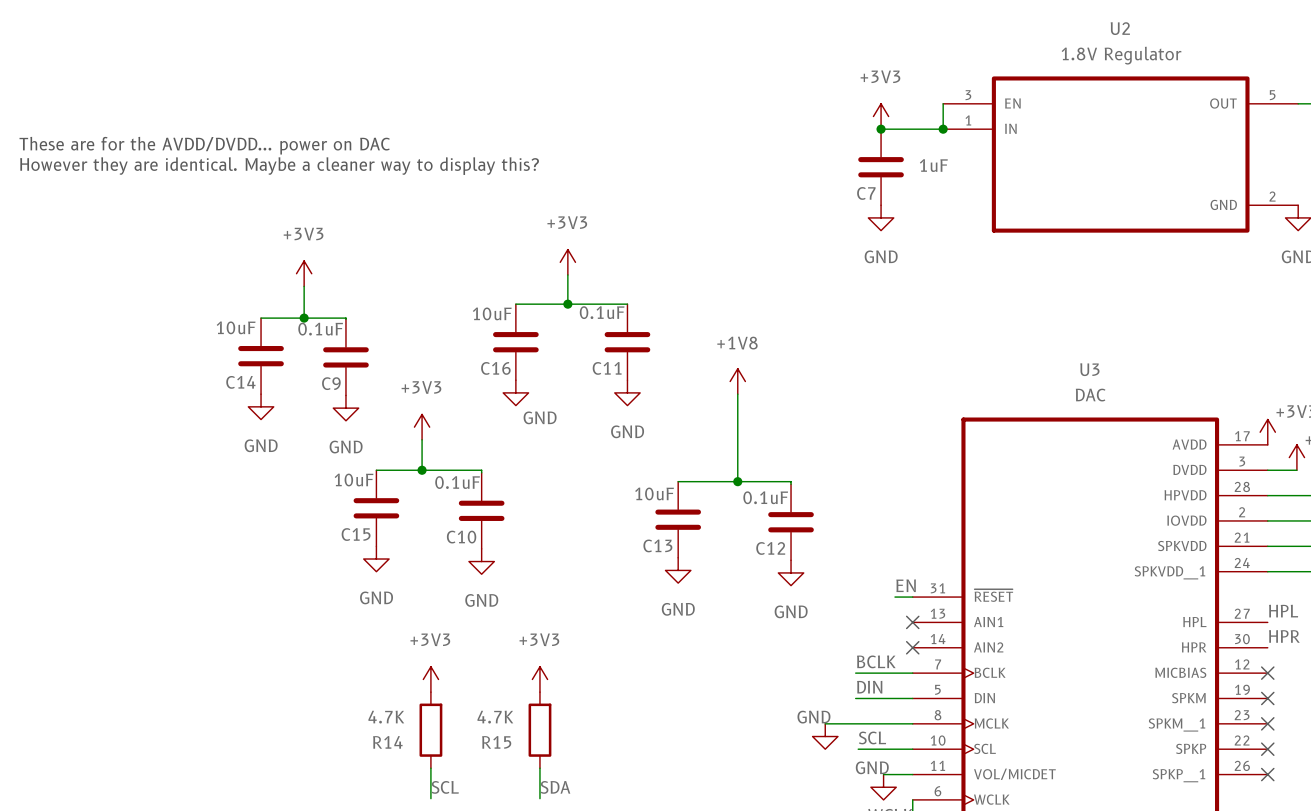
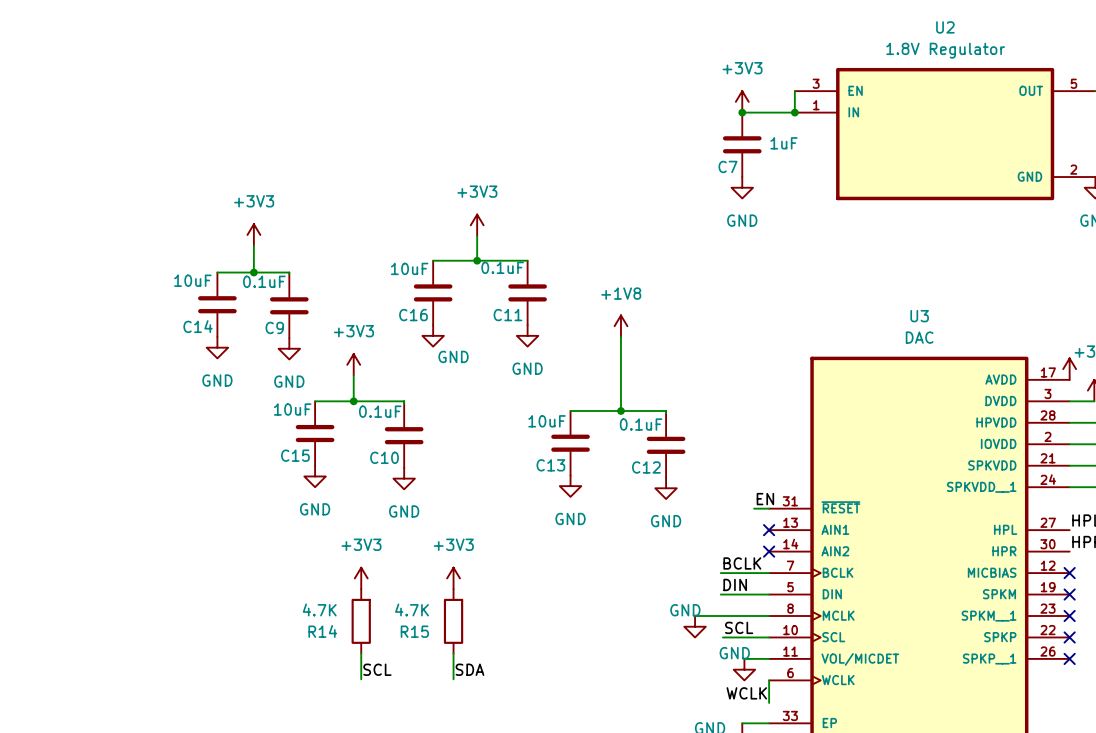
text: These are for the AVDD/DVDD... power on DAC (204, 145) -> none
text: However they are identical. Maybe a cleaner way to display this? (279, 166) -> none

